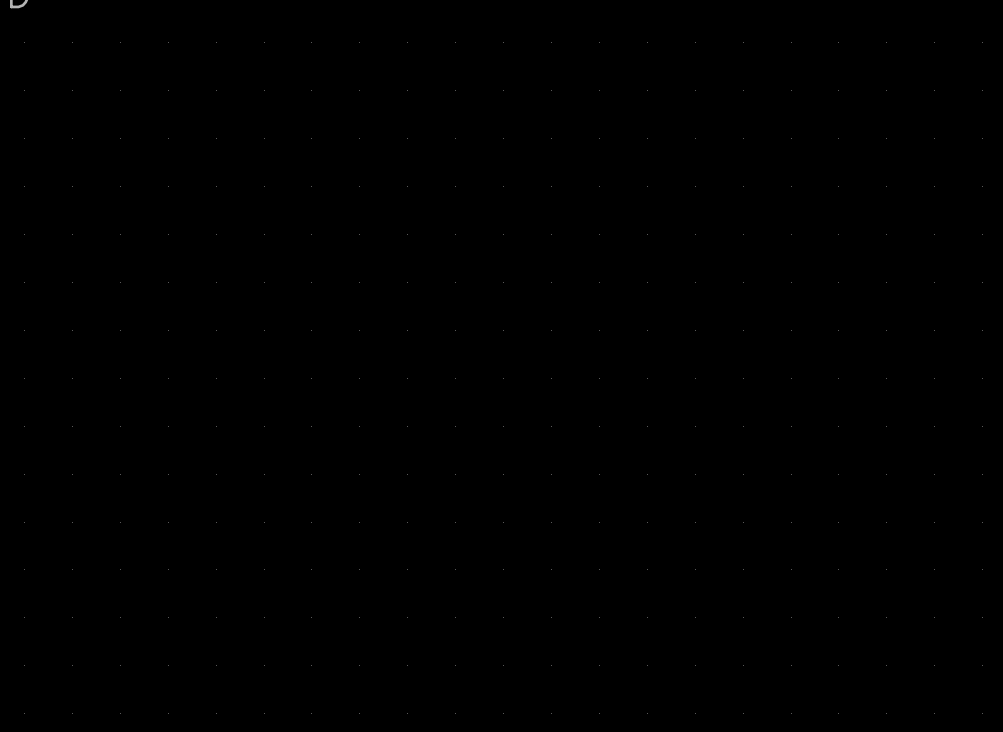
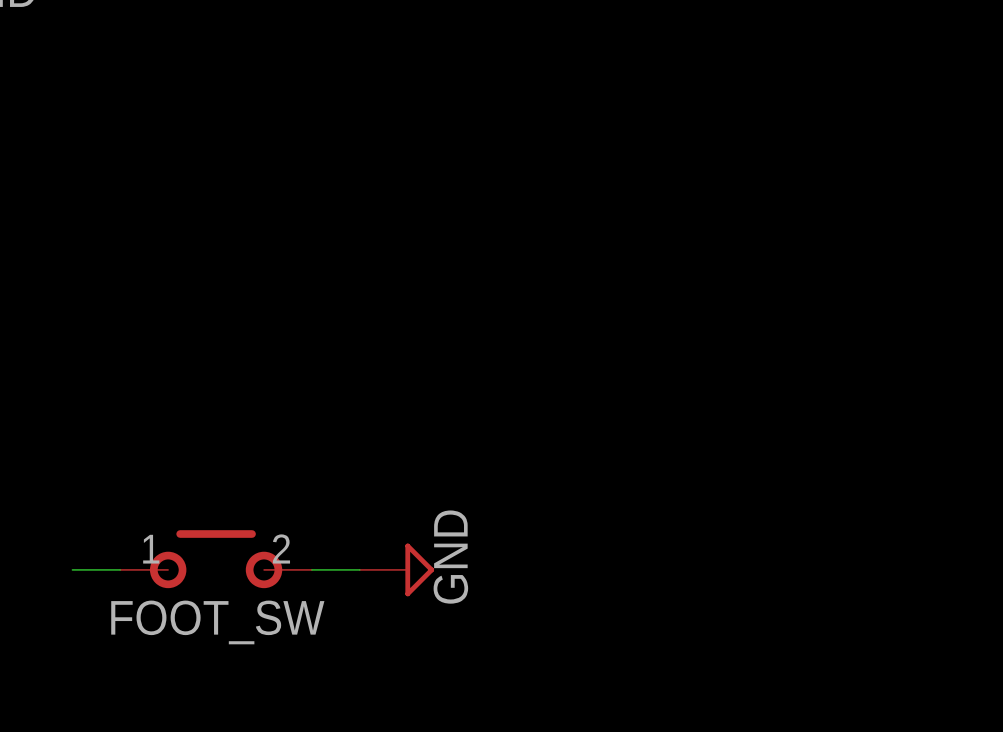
FOOT_SW: none -> (216, 559)
wire: none -> (72, 569) (120, 569)
wire: none -> (311, 569) (359, 569)
power symbol: none -> GND (396, 569)

